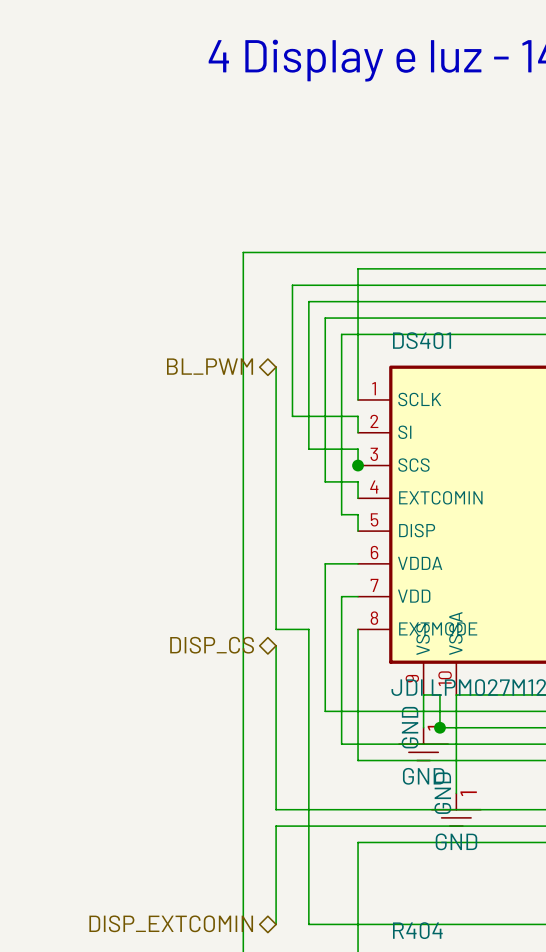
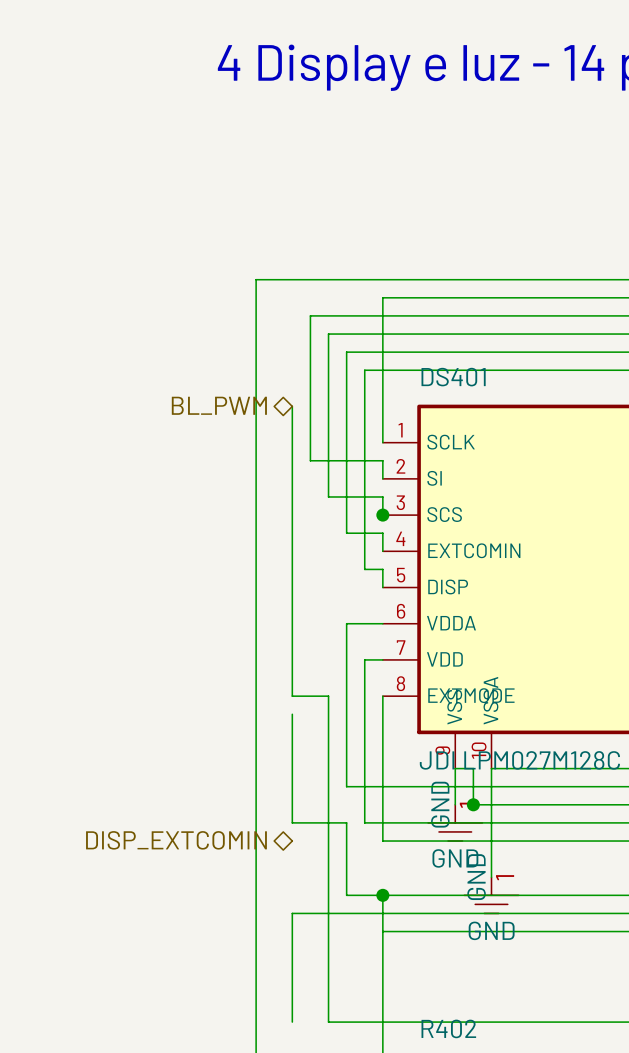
hierarchical label: DISP_CS (212, 645) -> none
wire: (276, 744) (276, 809) (325, 809) -> (292, 822) (346, 822) (346, 895)
wire: none -> (382, 895) (382, 931)
junction: none -> (382, 895)
hierarchical label position: DISP_EXTCOMIN (171, 923) -> DISP_EXTCOMIN (176, 840)
R404 name: R404 (417, 930) -> R402 (448, 1028)

